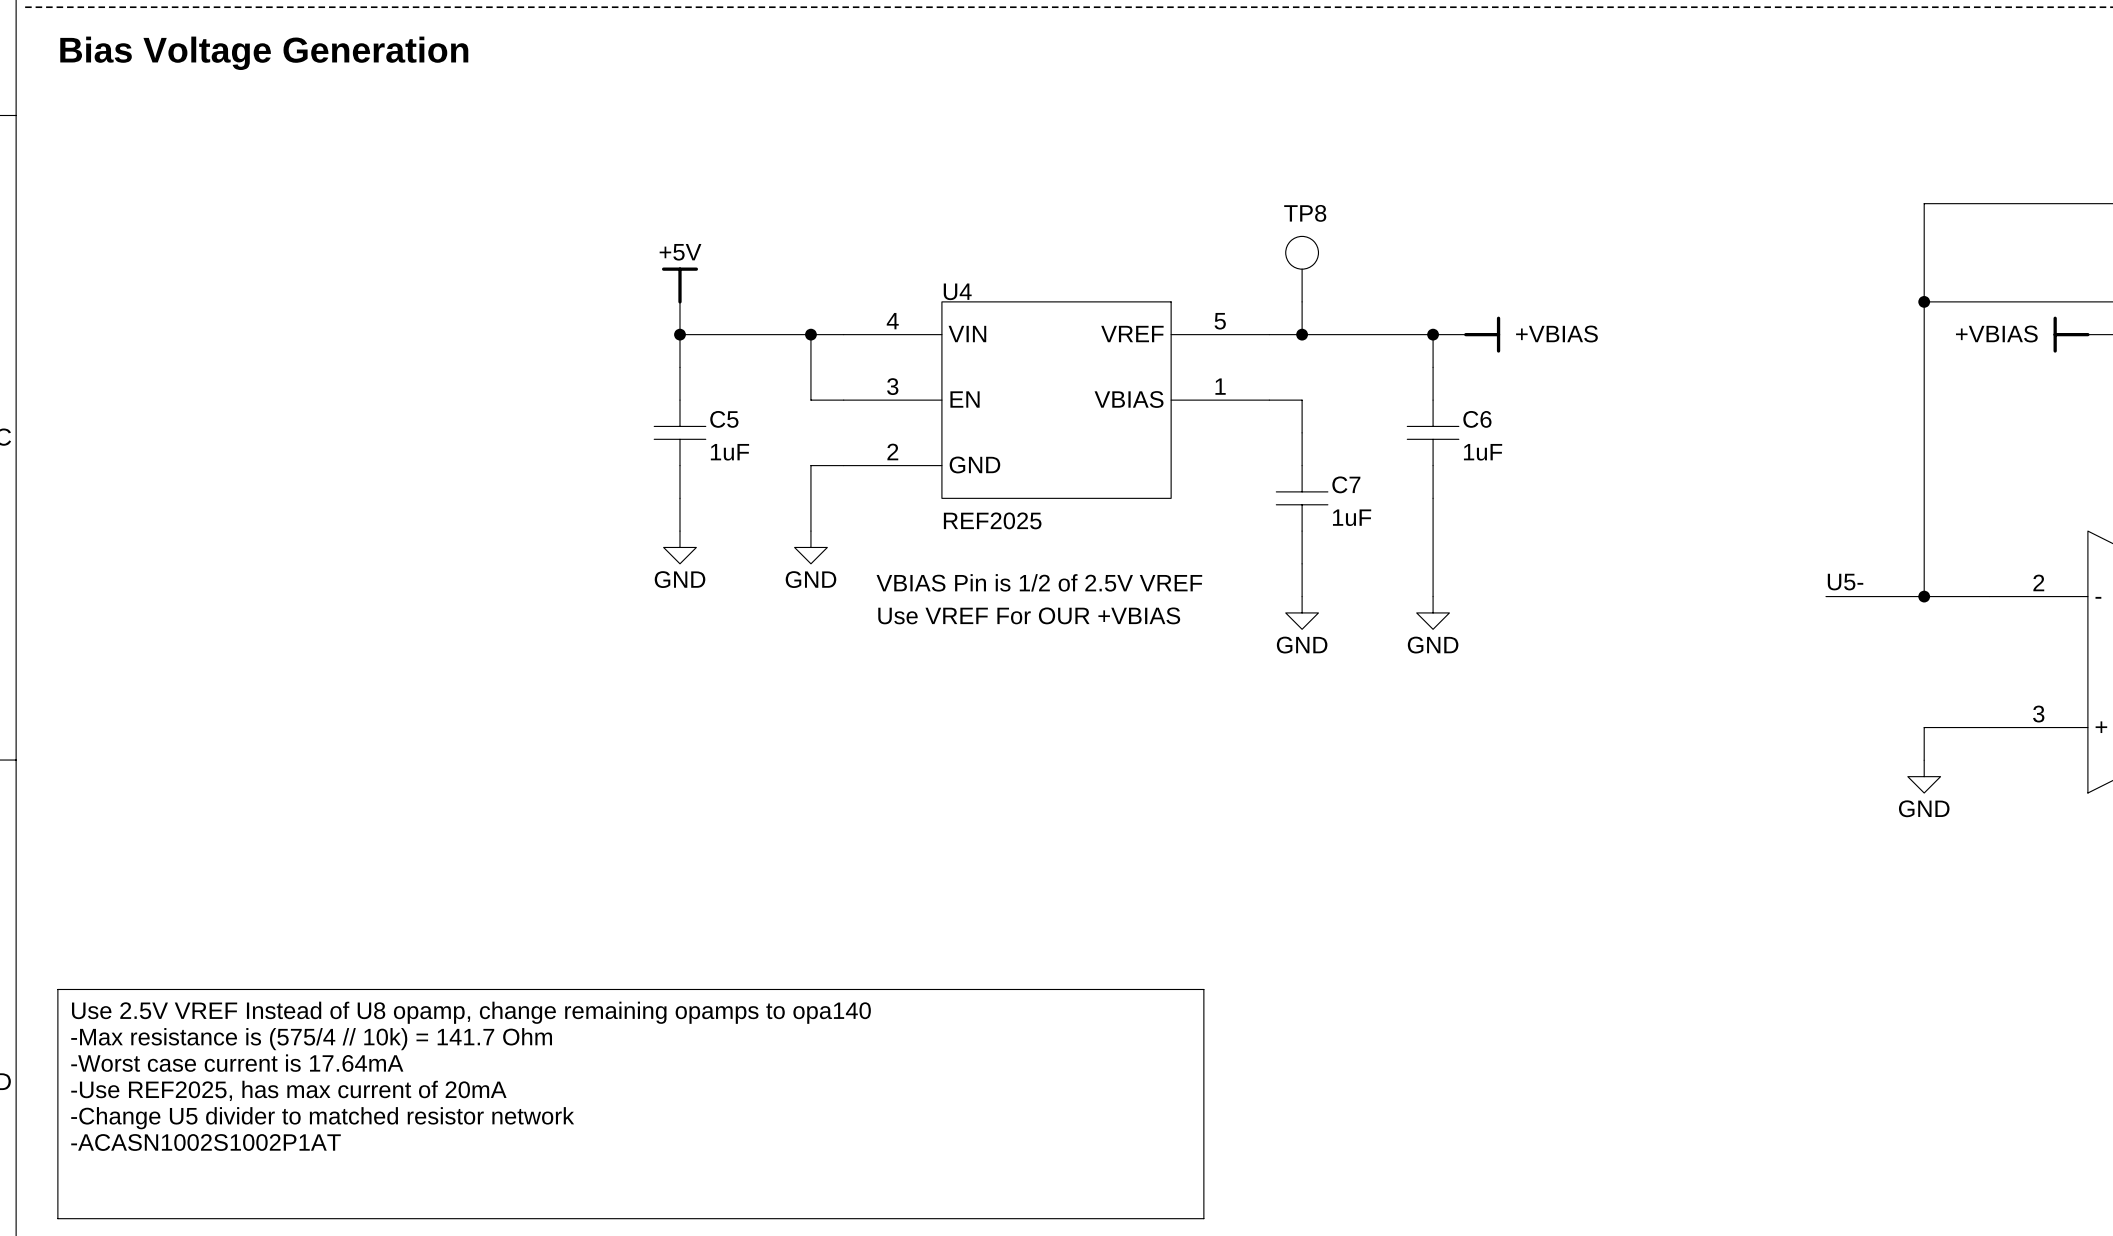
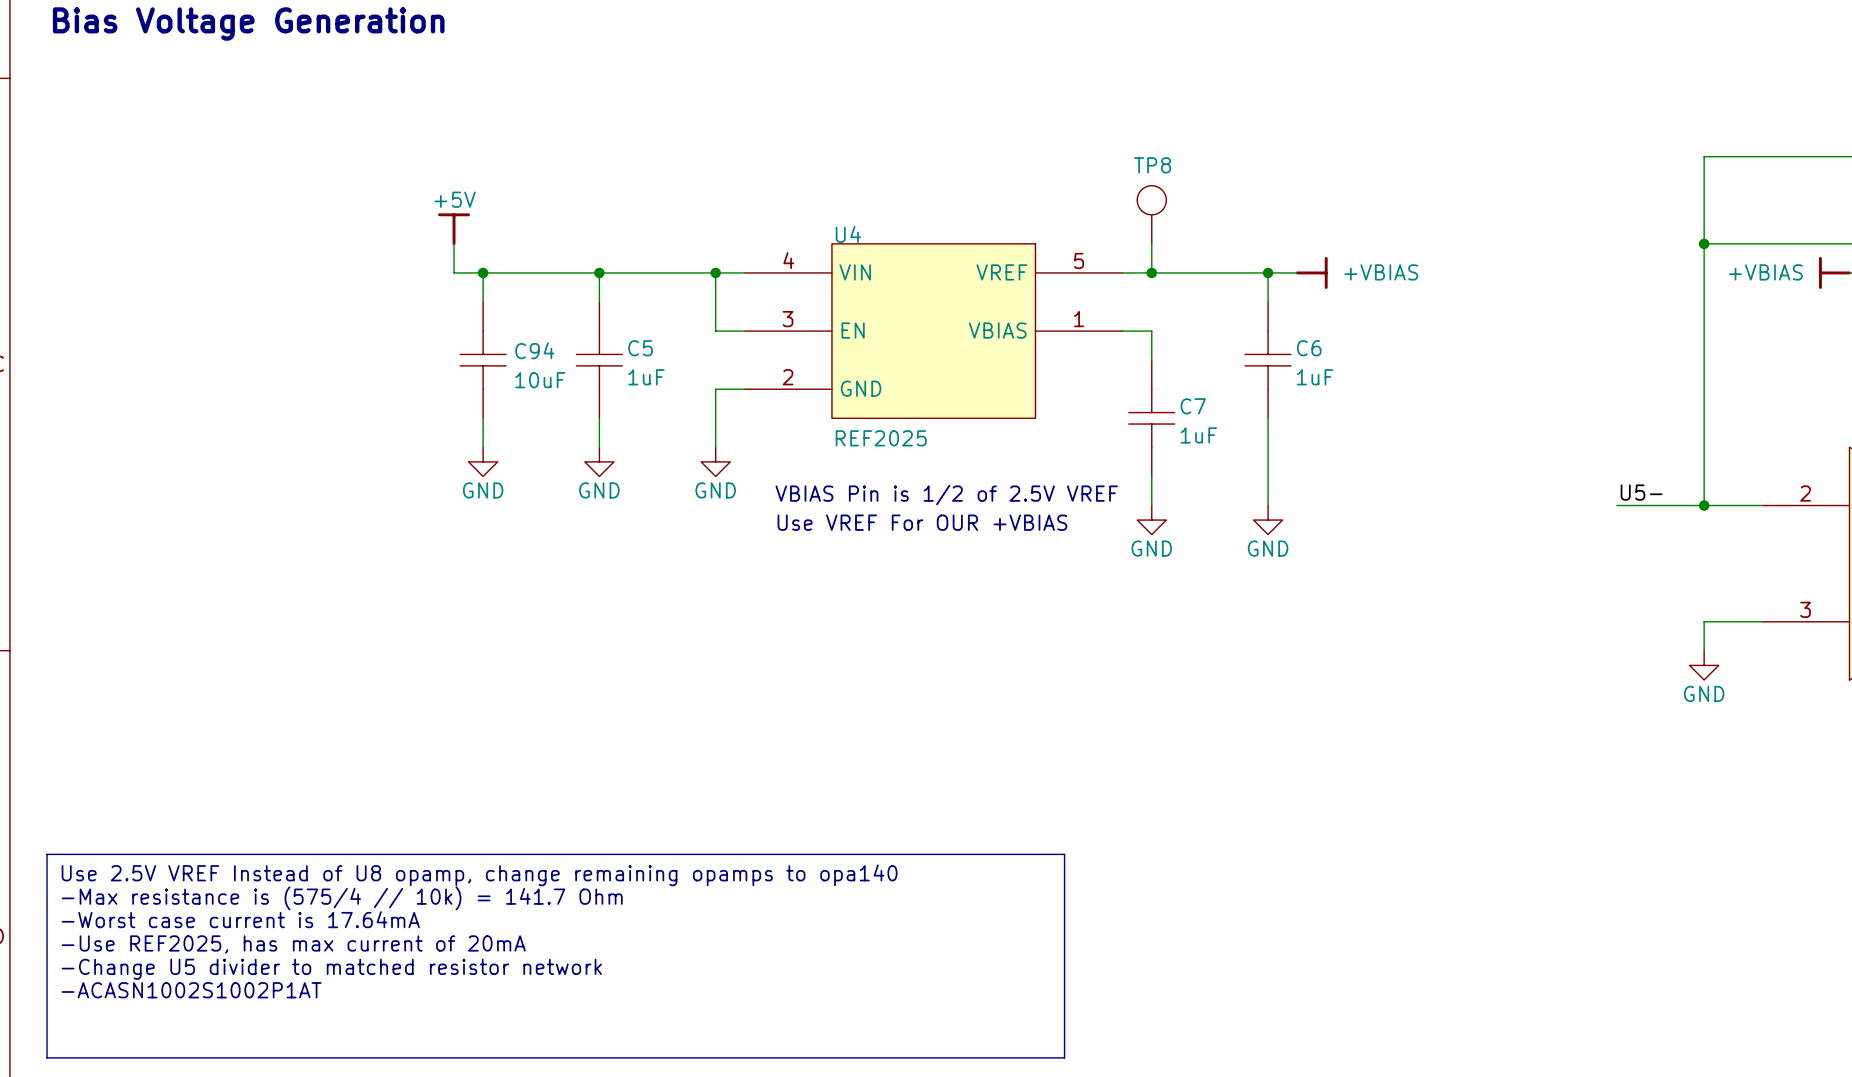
power symbol position: +5V (679, 285) -> +5V (454, 229)
wire: (679, 301) (679, 334) -> (454, 243) (454, 272) (599, 272)
wire: none -> (483, 272) (483, 302)
junction: none -> (483, 272)
C94: none -> 10uF (483, 360)
wire: none -> (483, 418) (483, 447)
power symbol: none -> GND (483, 461)

